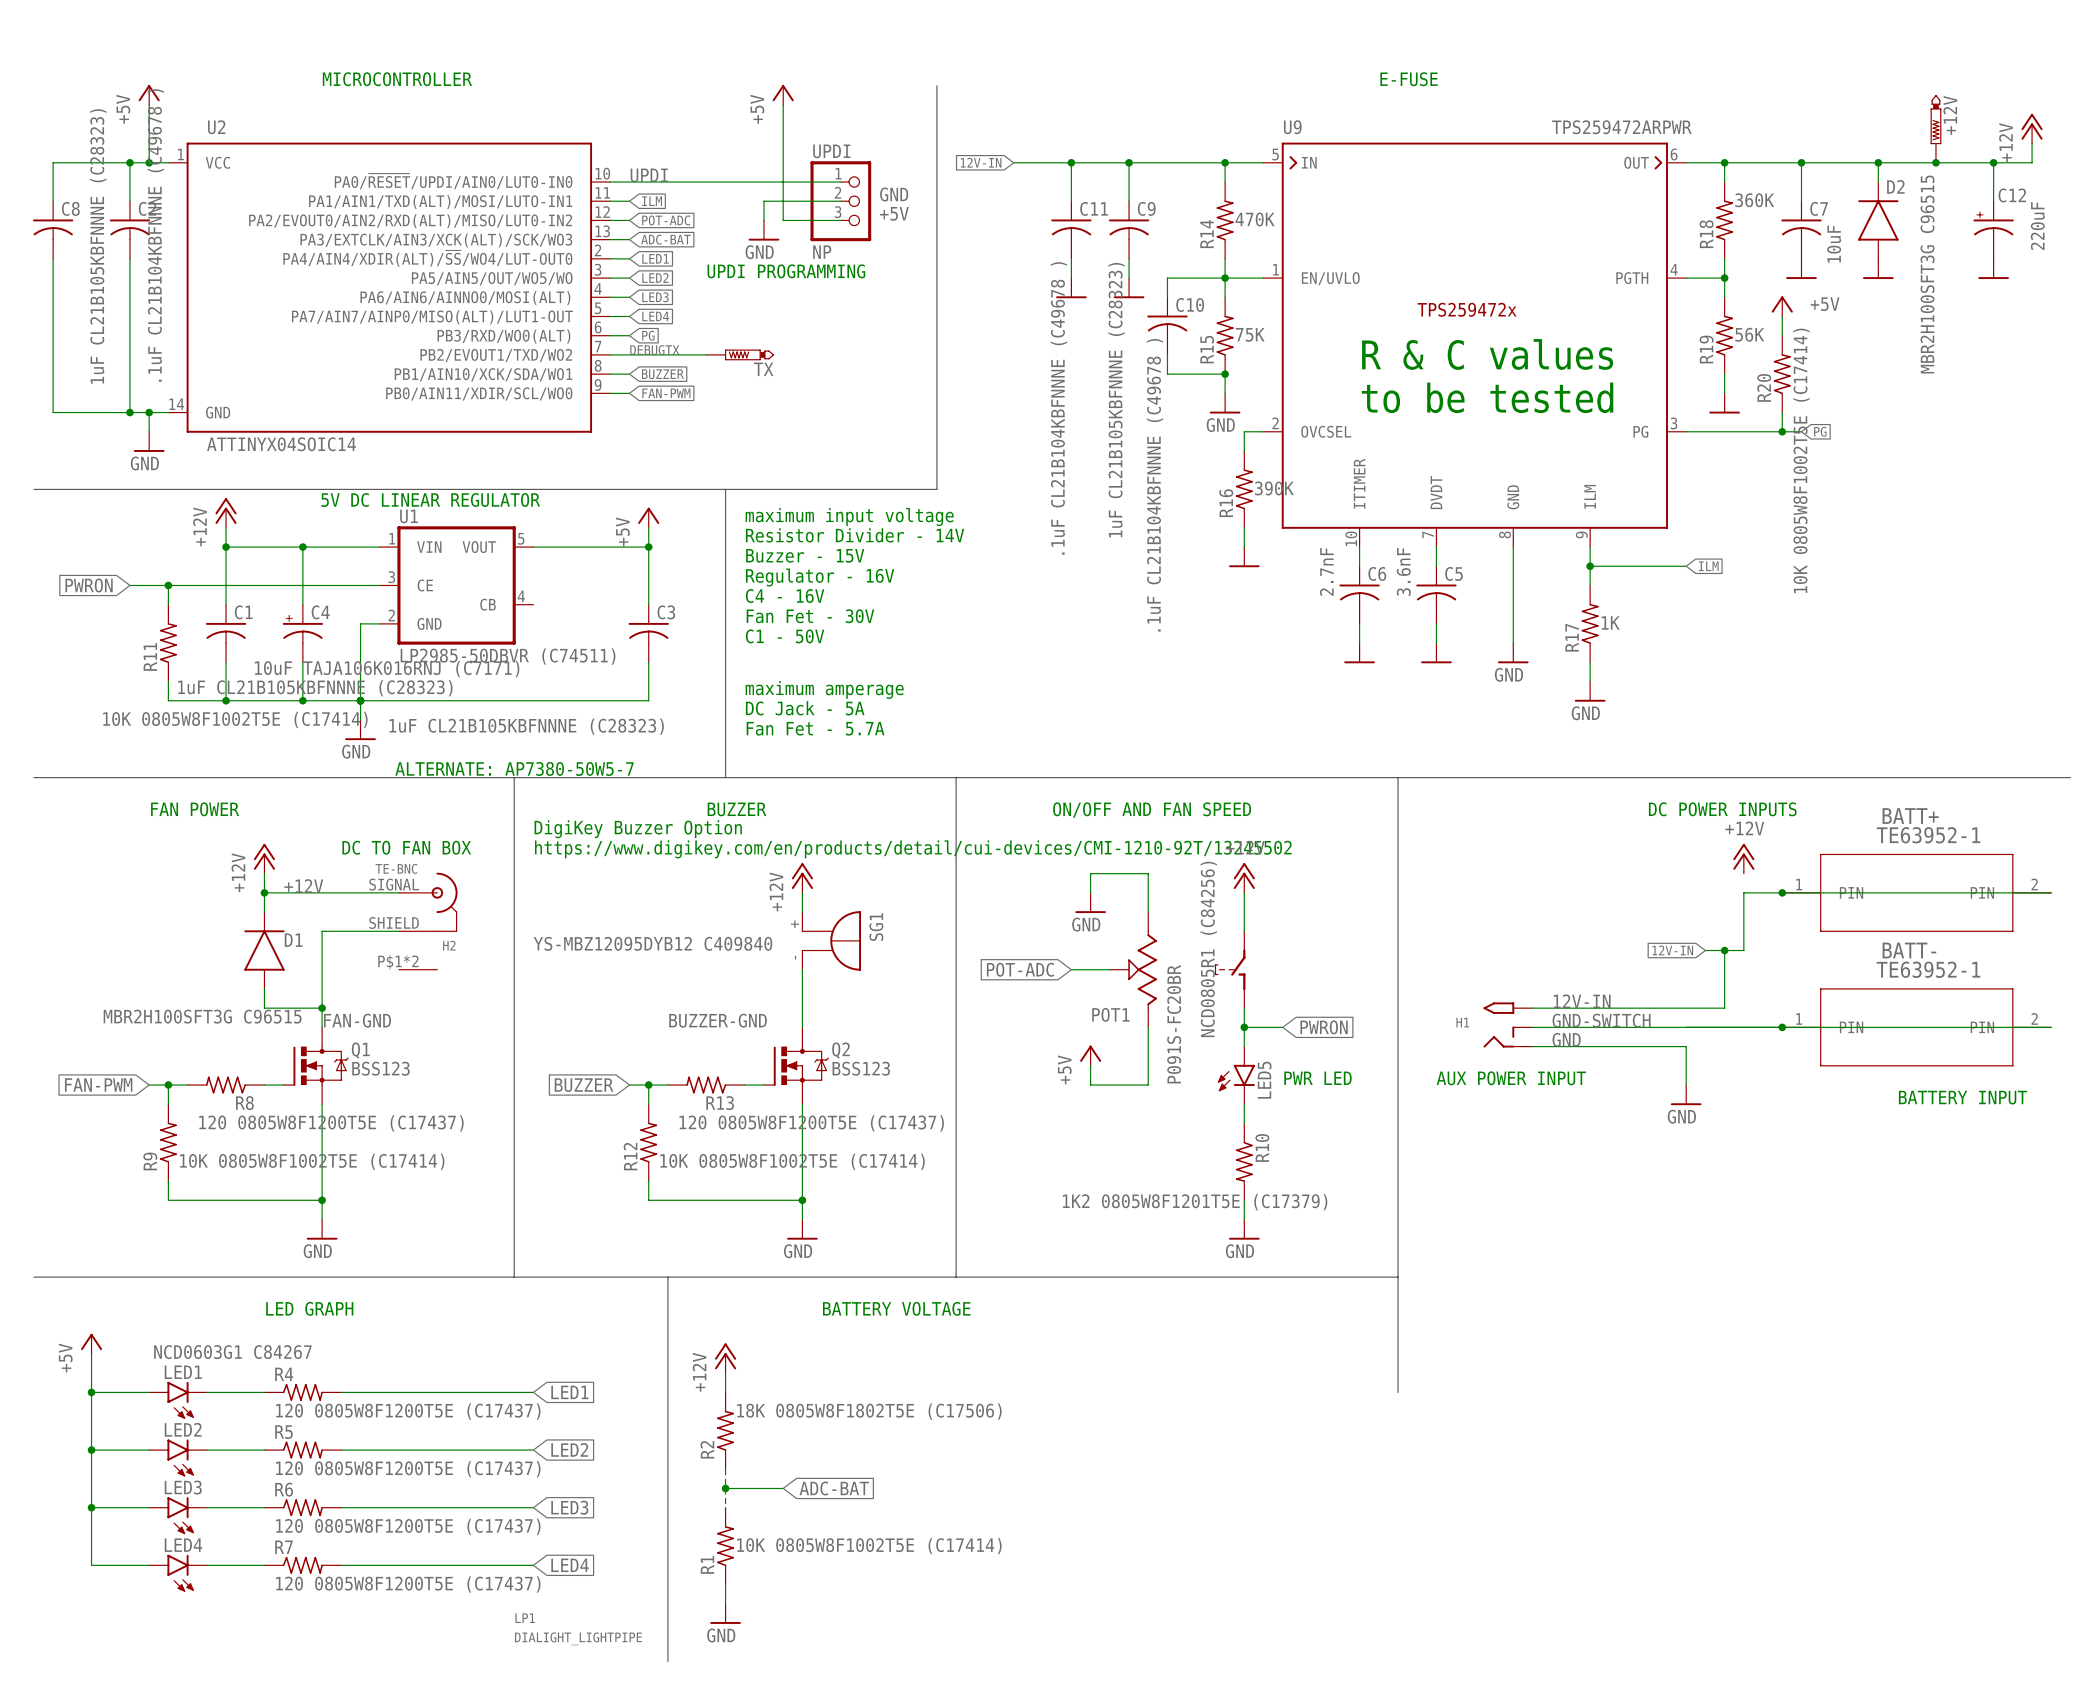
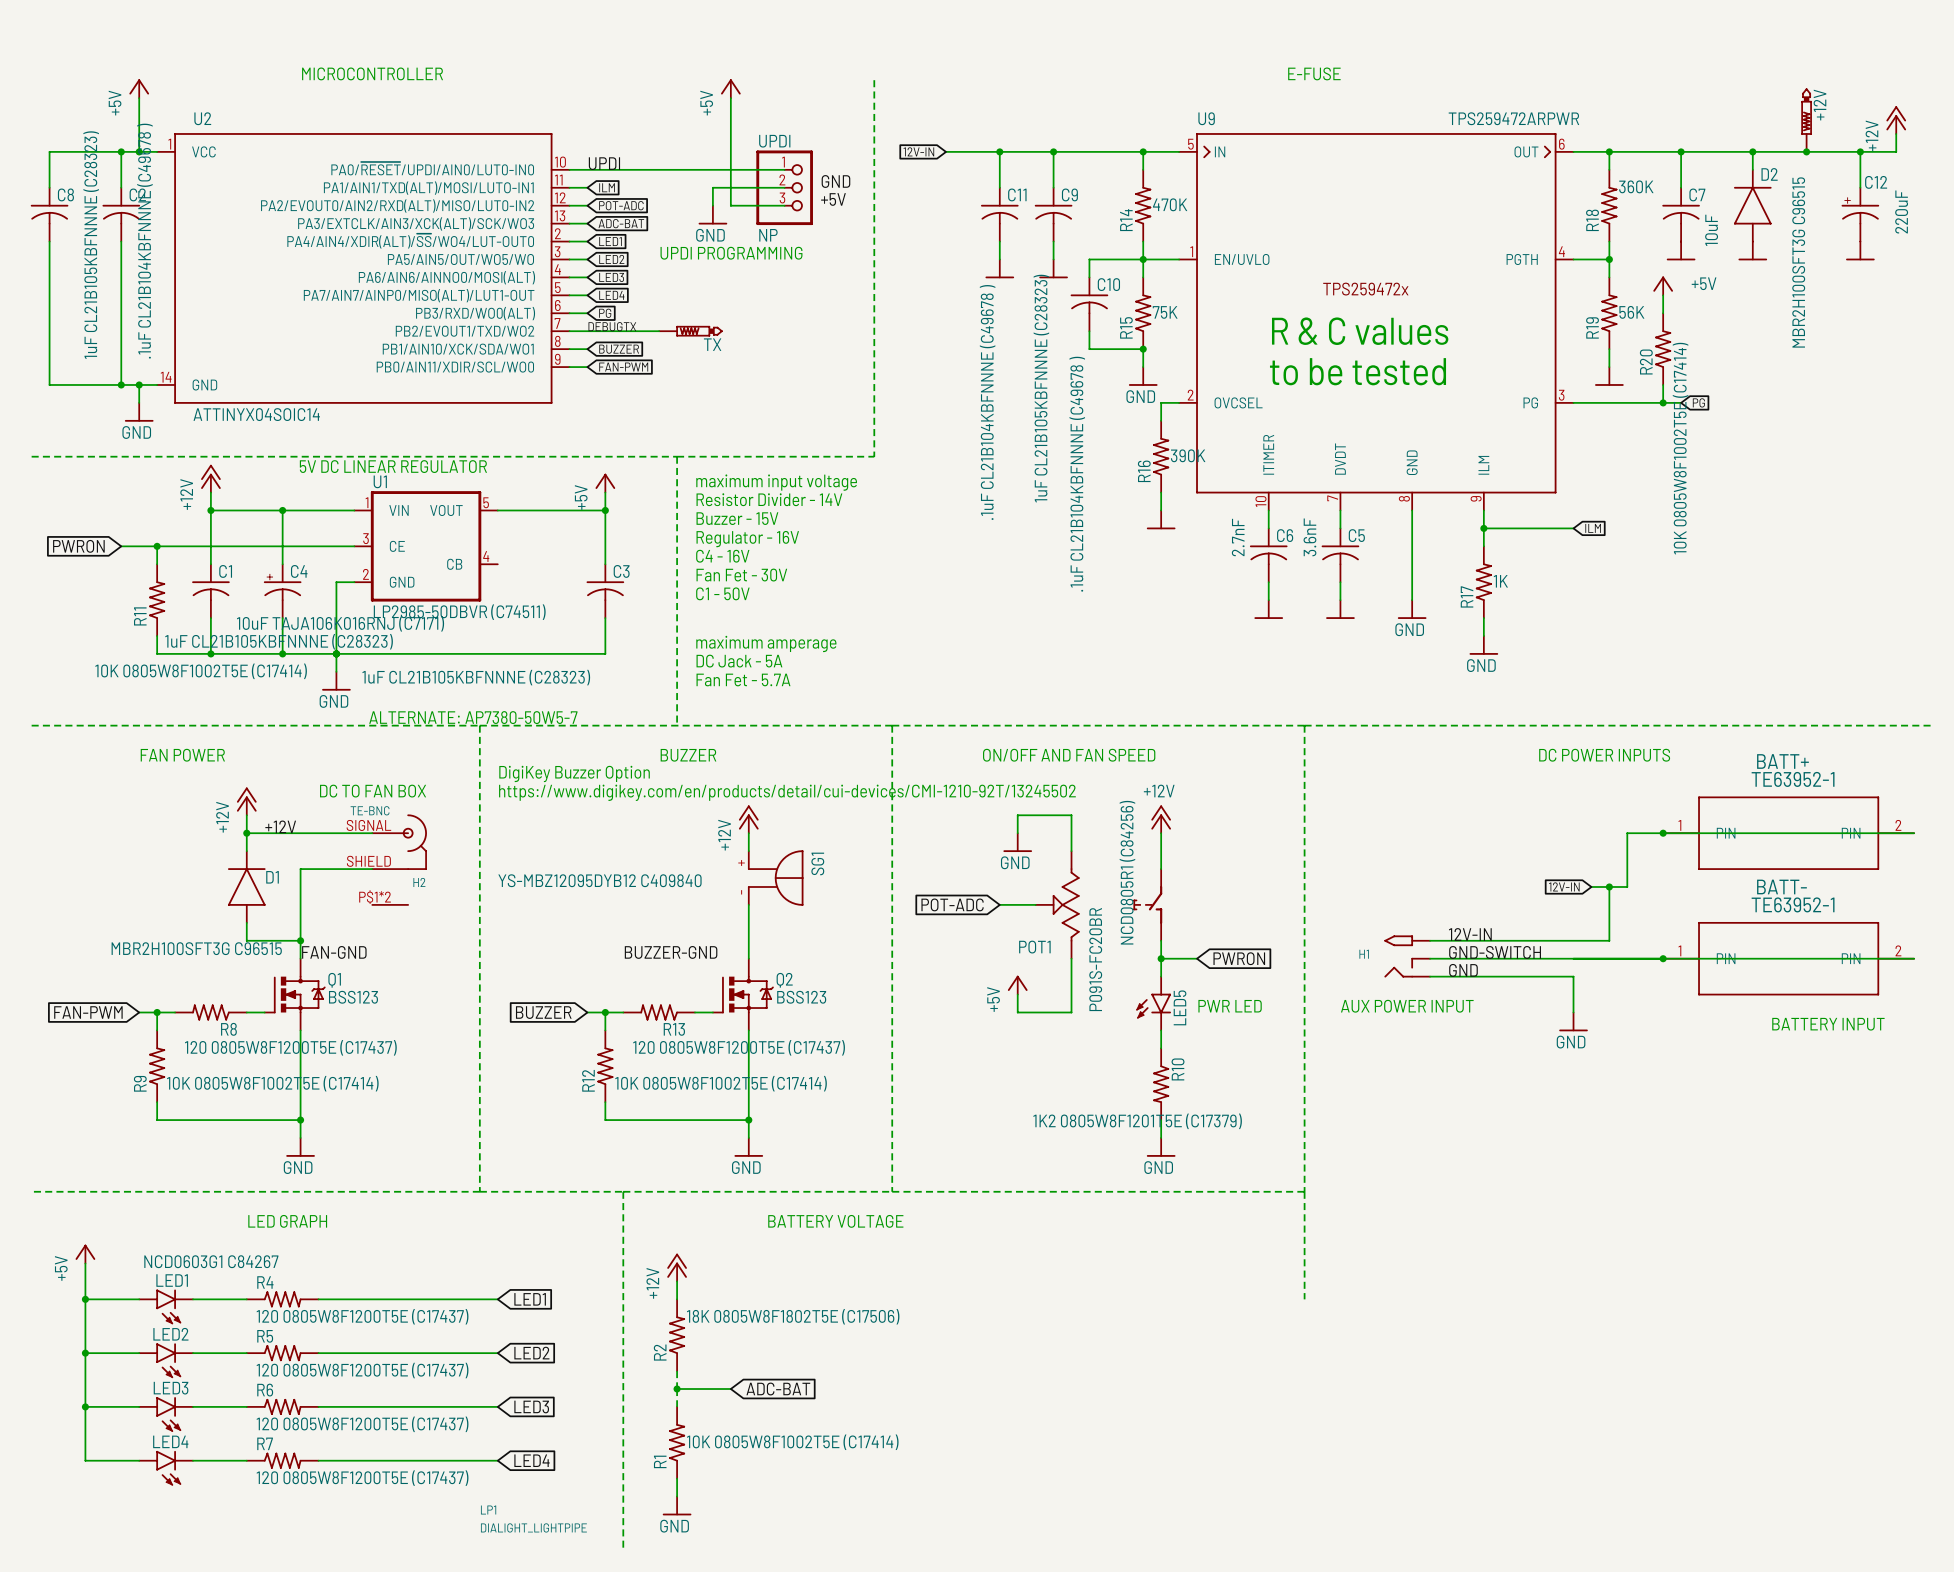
line: (936, 85) (936, 489) (33, 489) -> none
line: (725, 489) (725, 777) -> none
line: (33, 777) (2070, 777) -> none
line: (514, 777) (514, 1277) -> none
line: (956, 777) (956, 1277) -> none
line: (1398, 777) (1398, 1392) -> none
power symbol: +12V (1743, 858) -> none
line: (33, 1277) (1398, 1277) -> none
line: (667, 1277) (667, 1661) -> none

